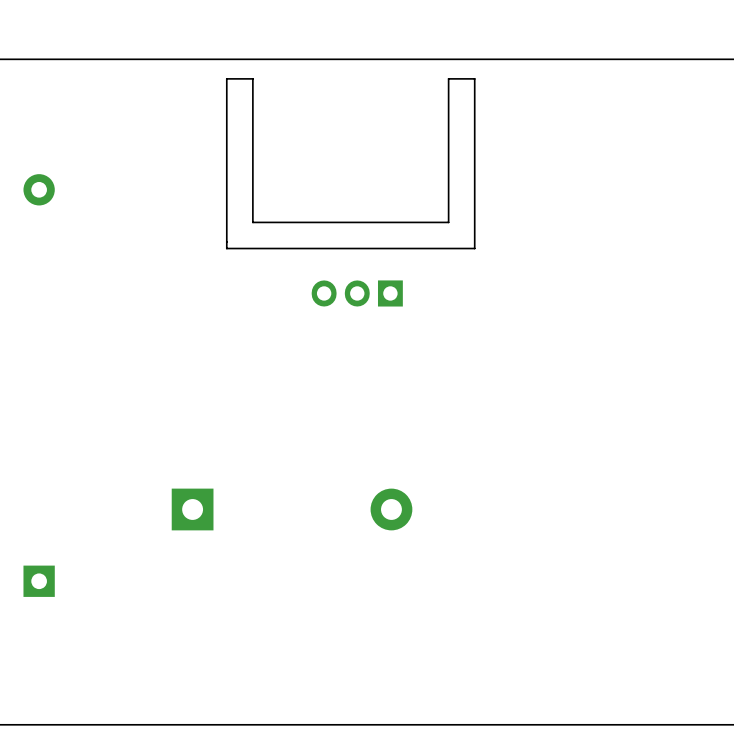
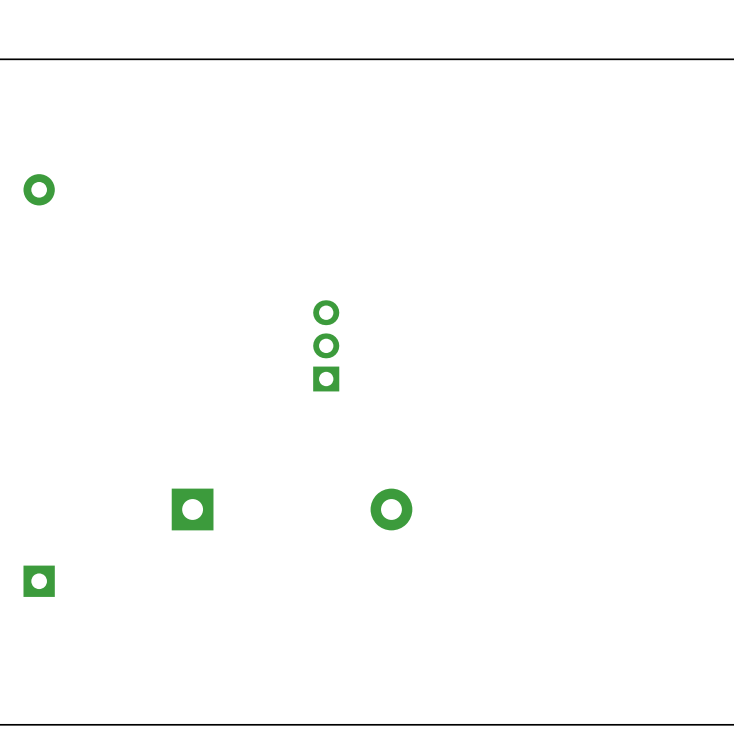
drawing: [226, 78, 476, 250] -> none
part rotation: 0° (357, 293) -> 90° clockwise (326, 345)
part position: (357, 293) -> (326, 345)

